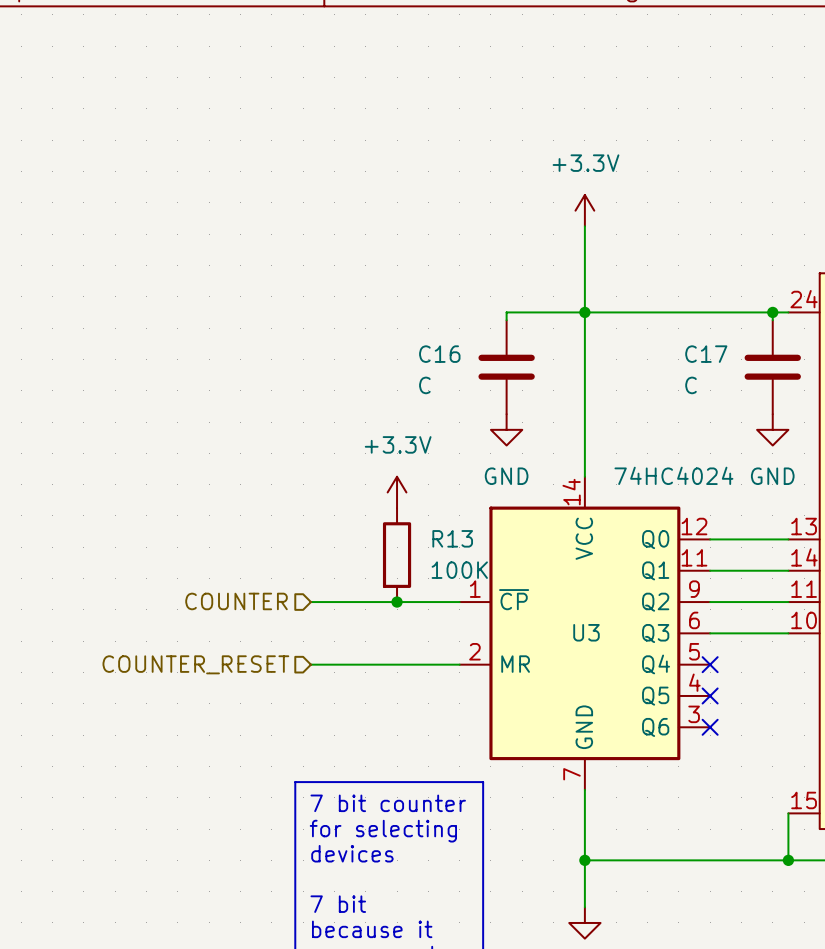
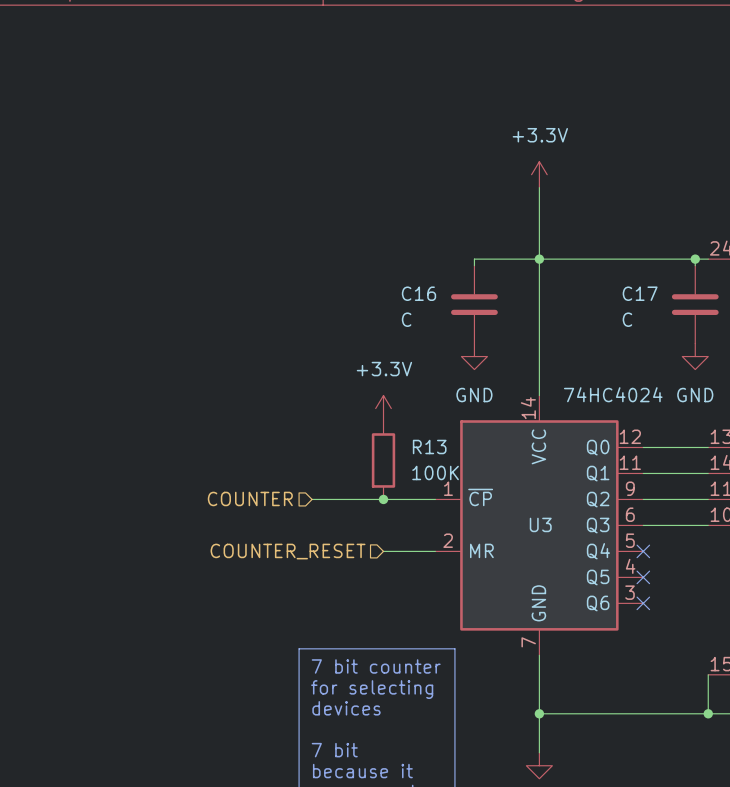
hierarchical label position: COUNTER_RESET (195, 664) -> COUNTER_RESET (288, 551)
wire: (310, 664) (397, 664) -> none

